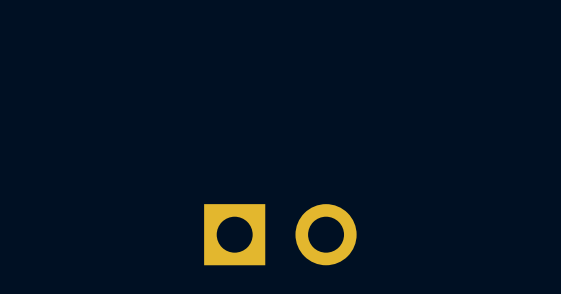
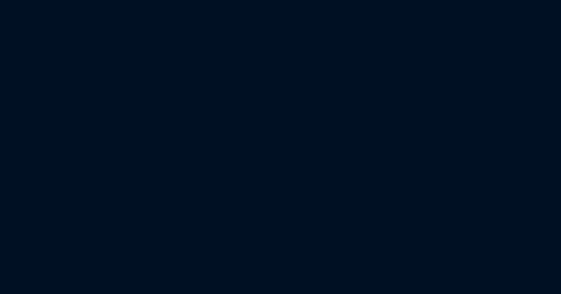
part: (280, 234) -> none

